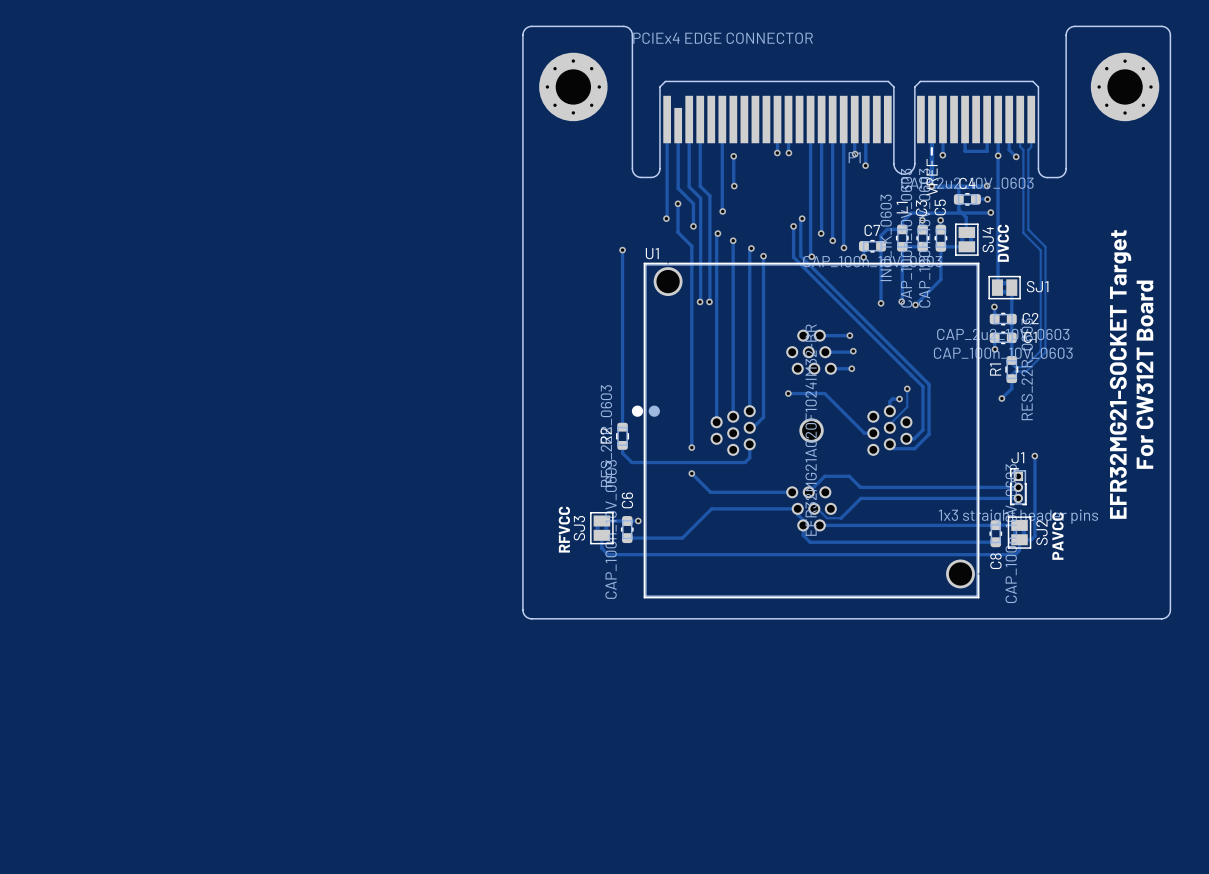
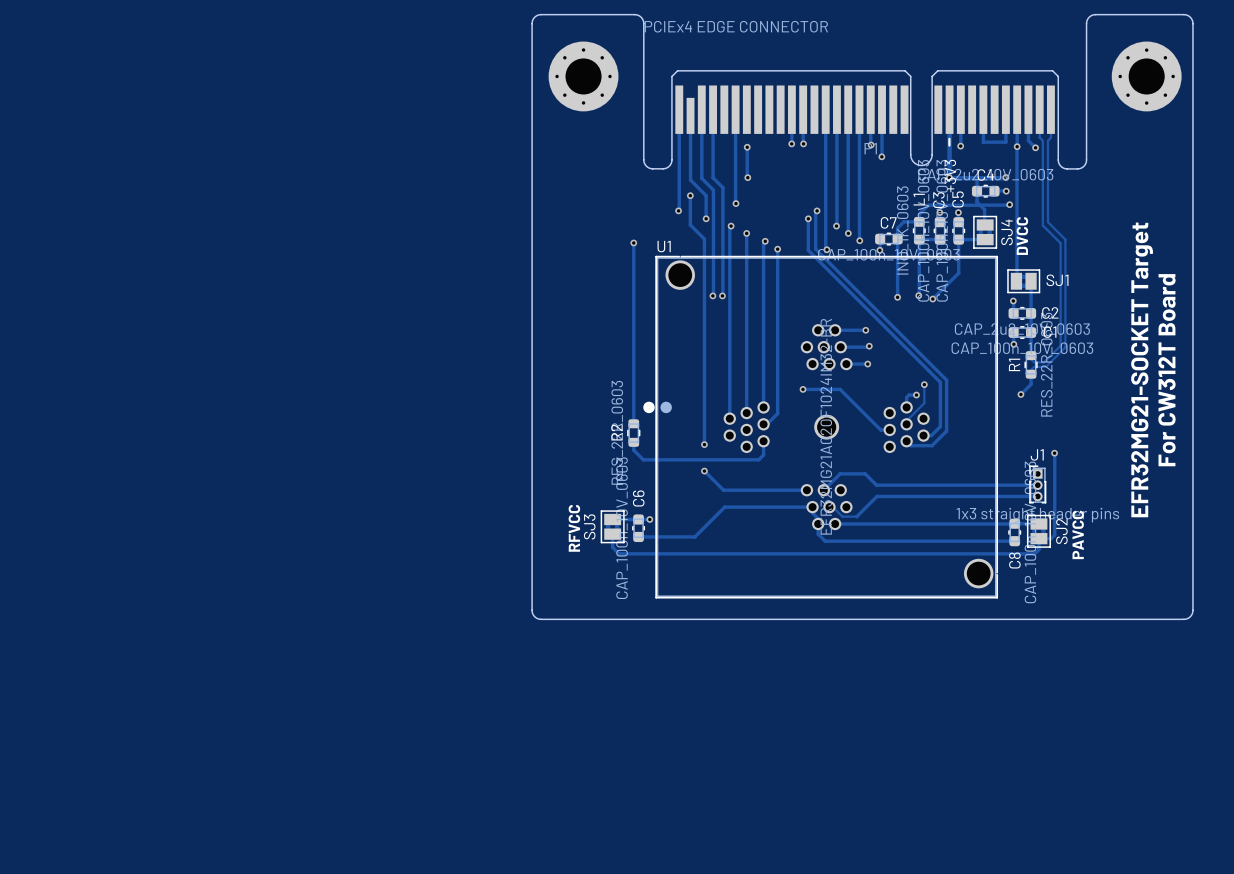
text: VREF (932, 177) -> +3V3 (950, 176)

